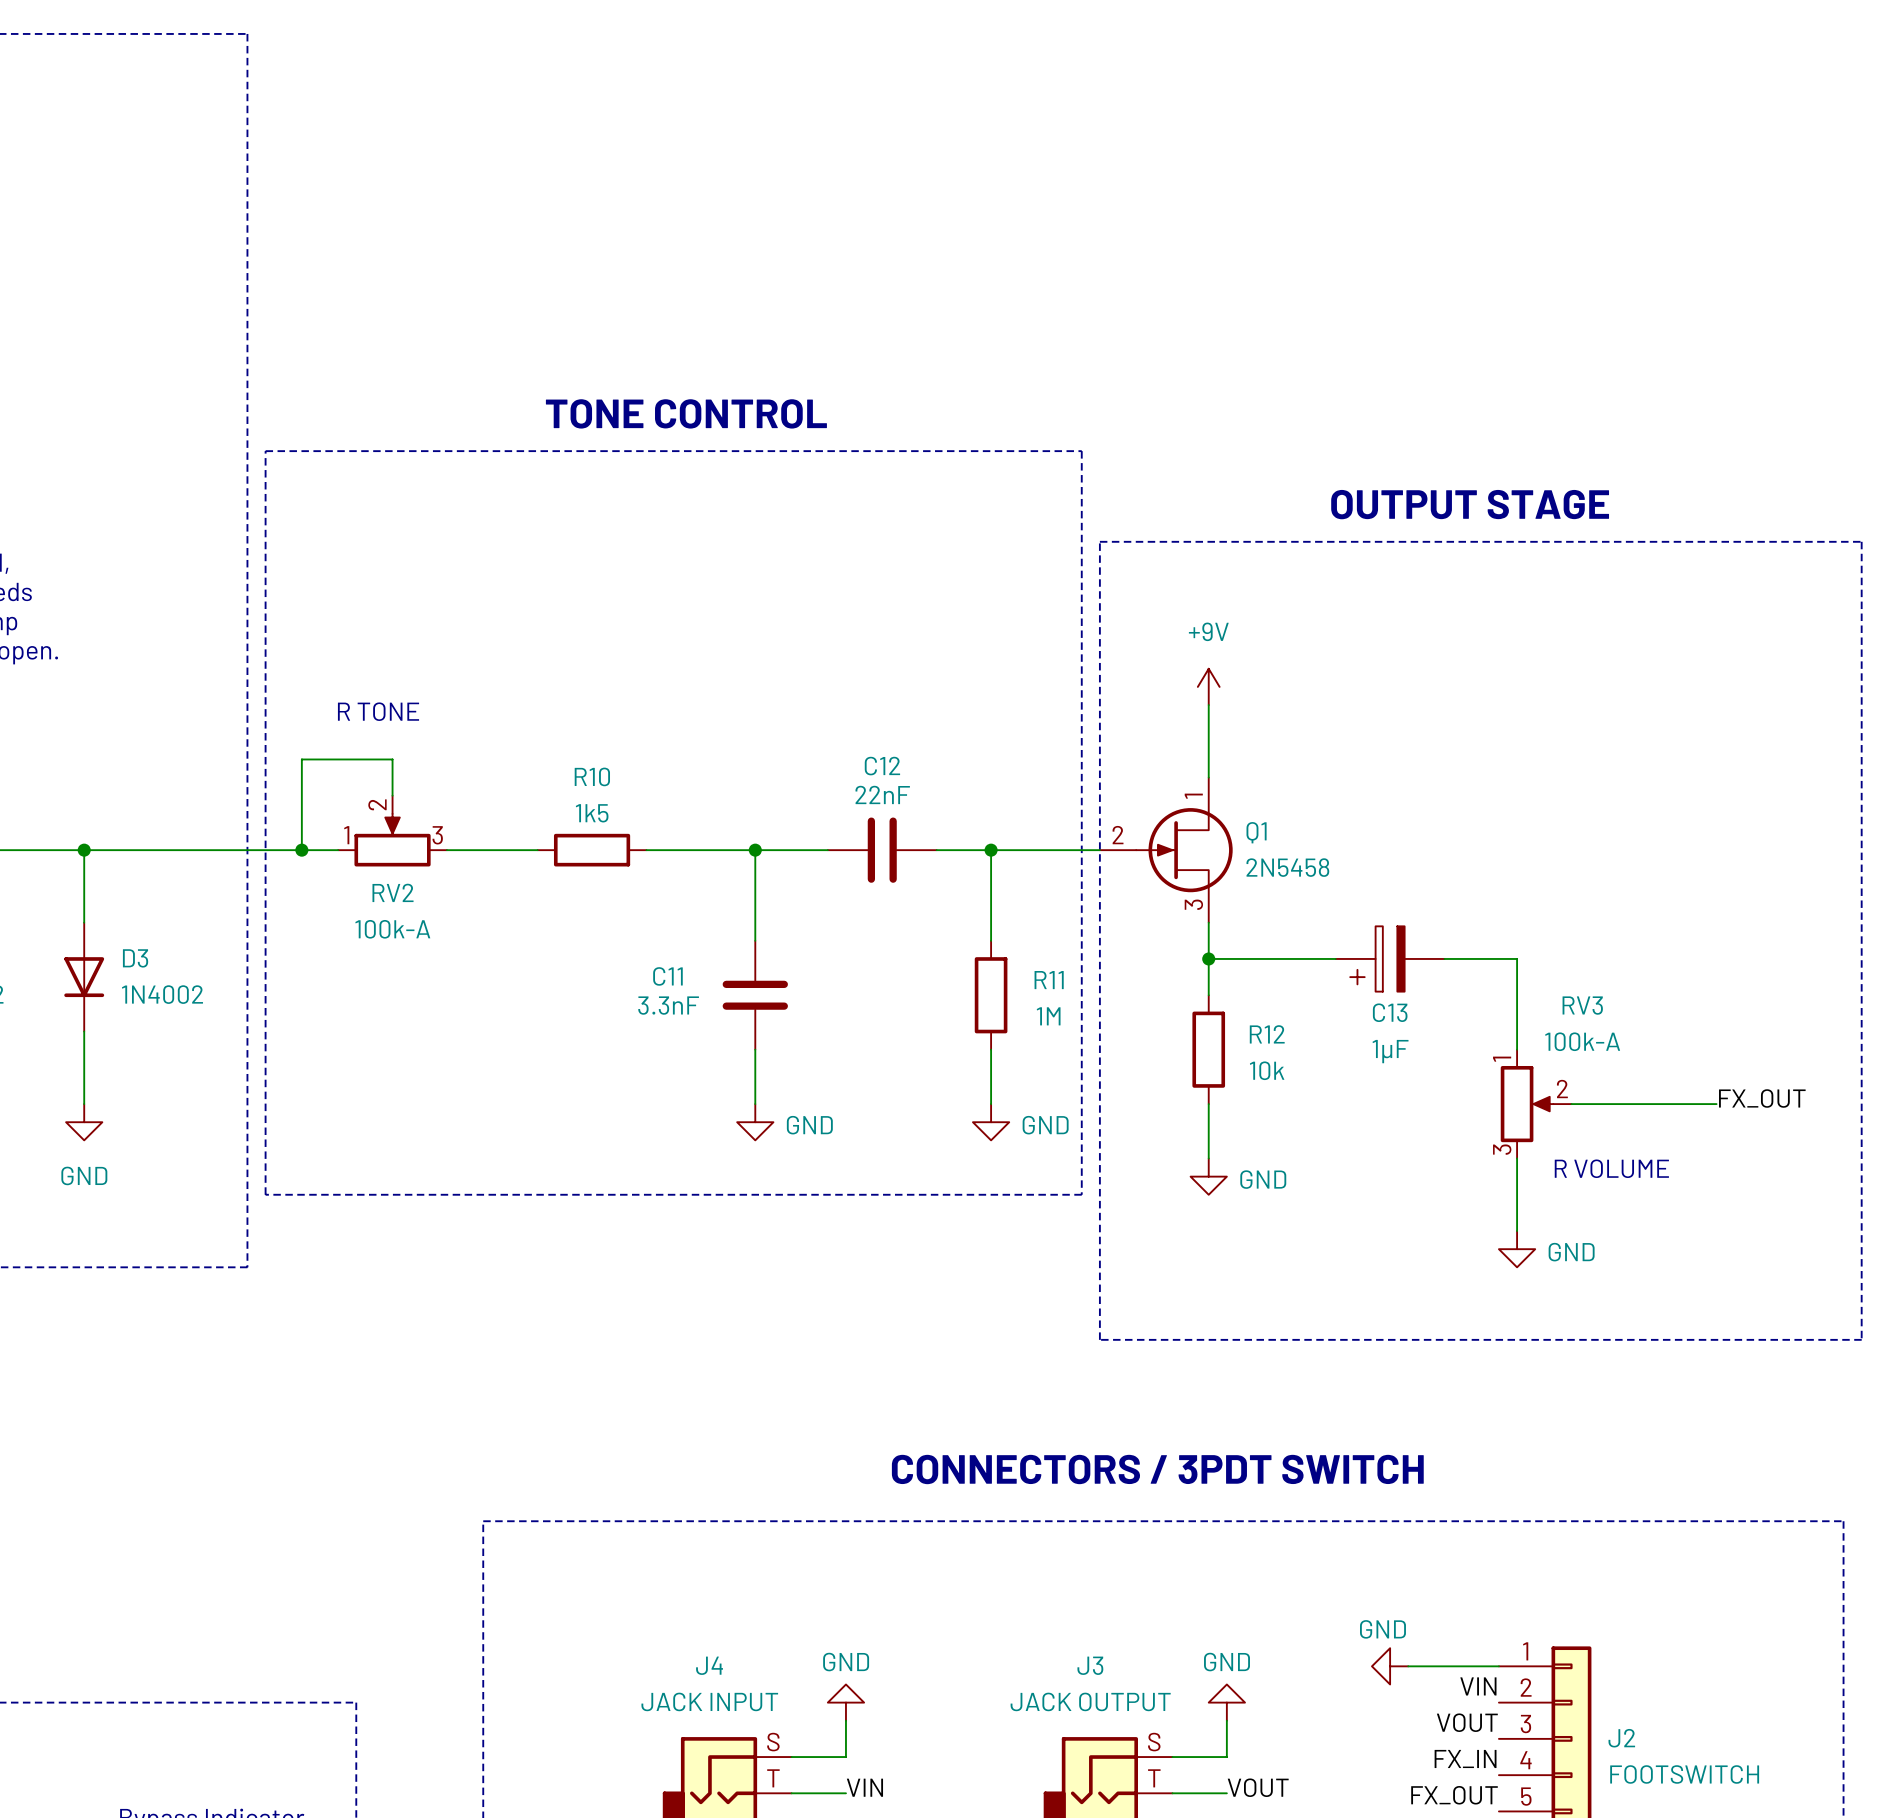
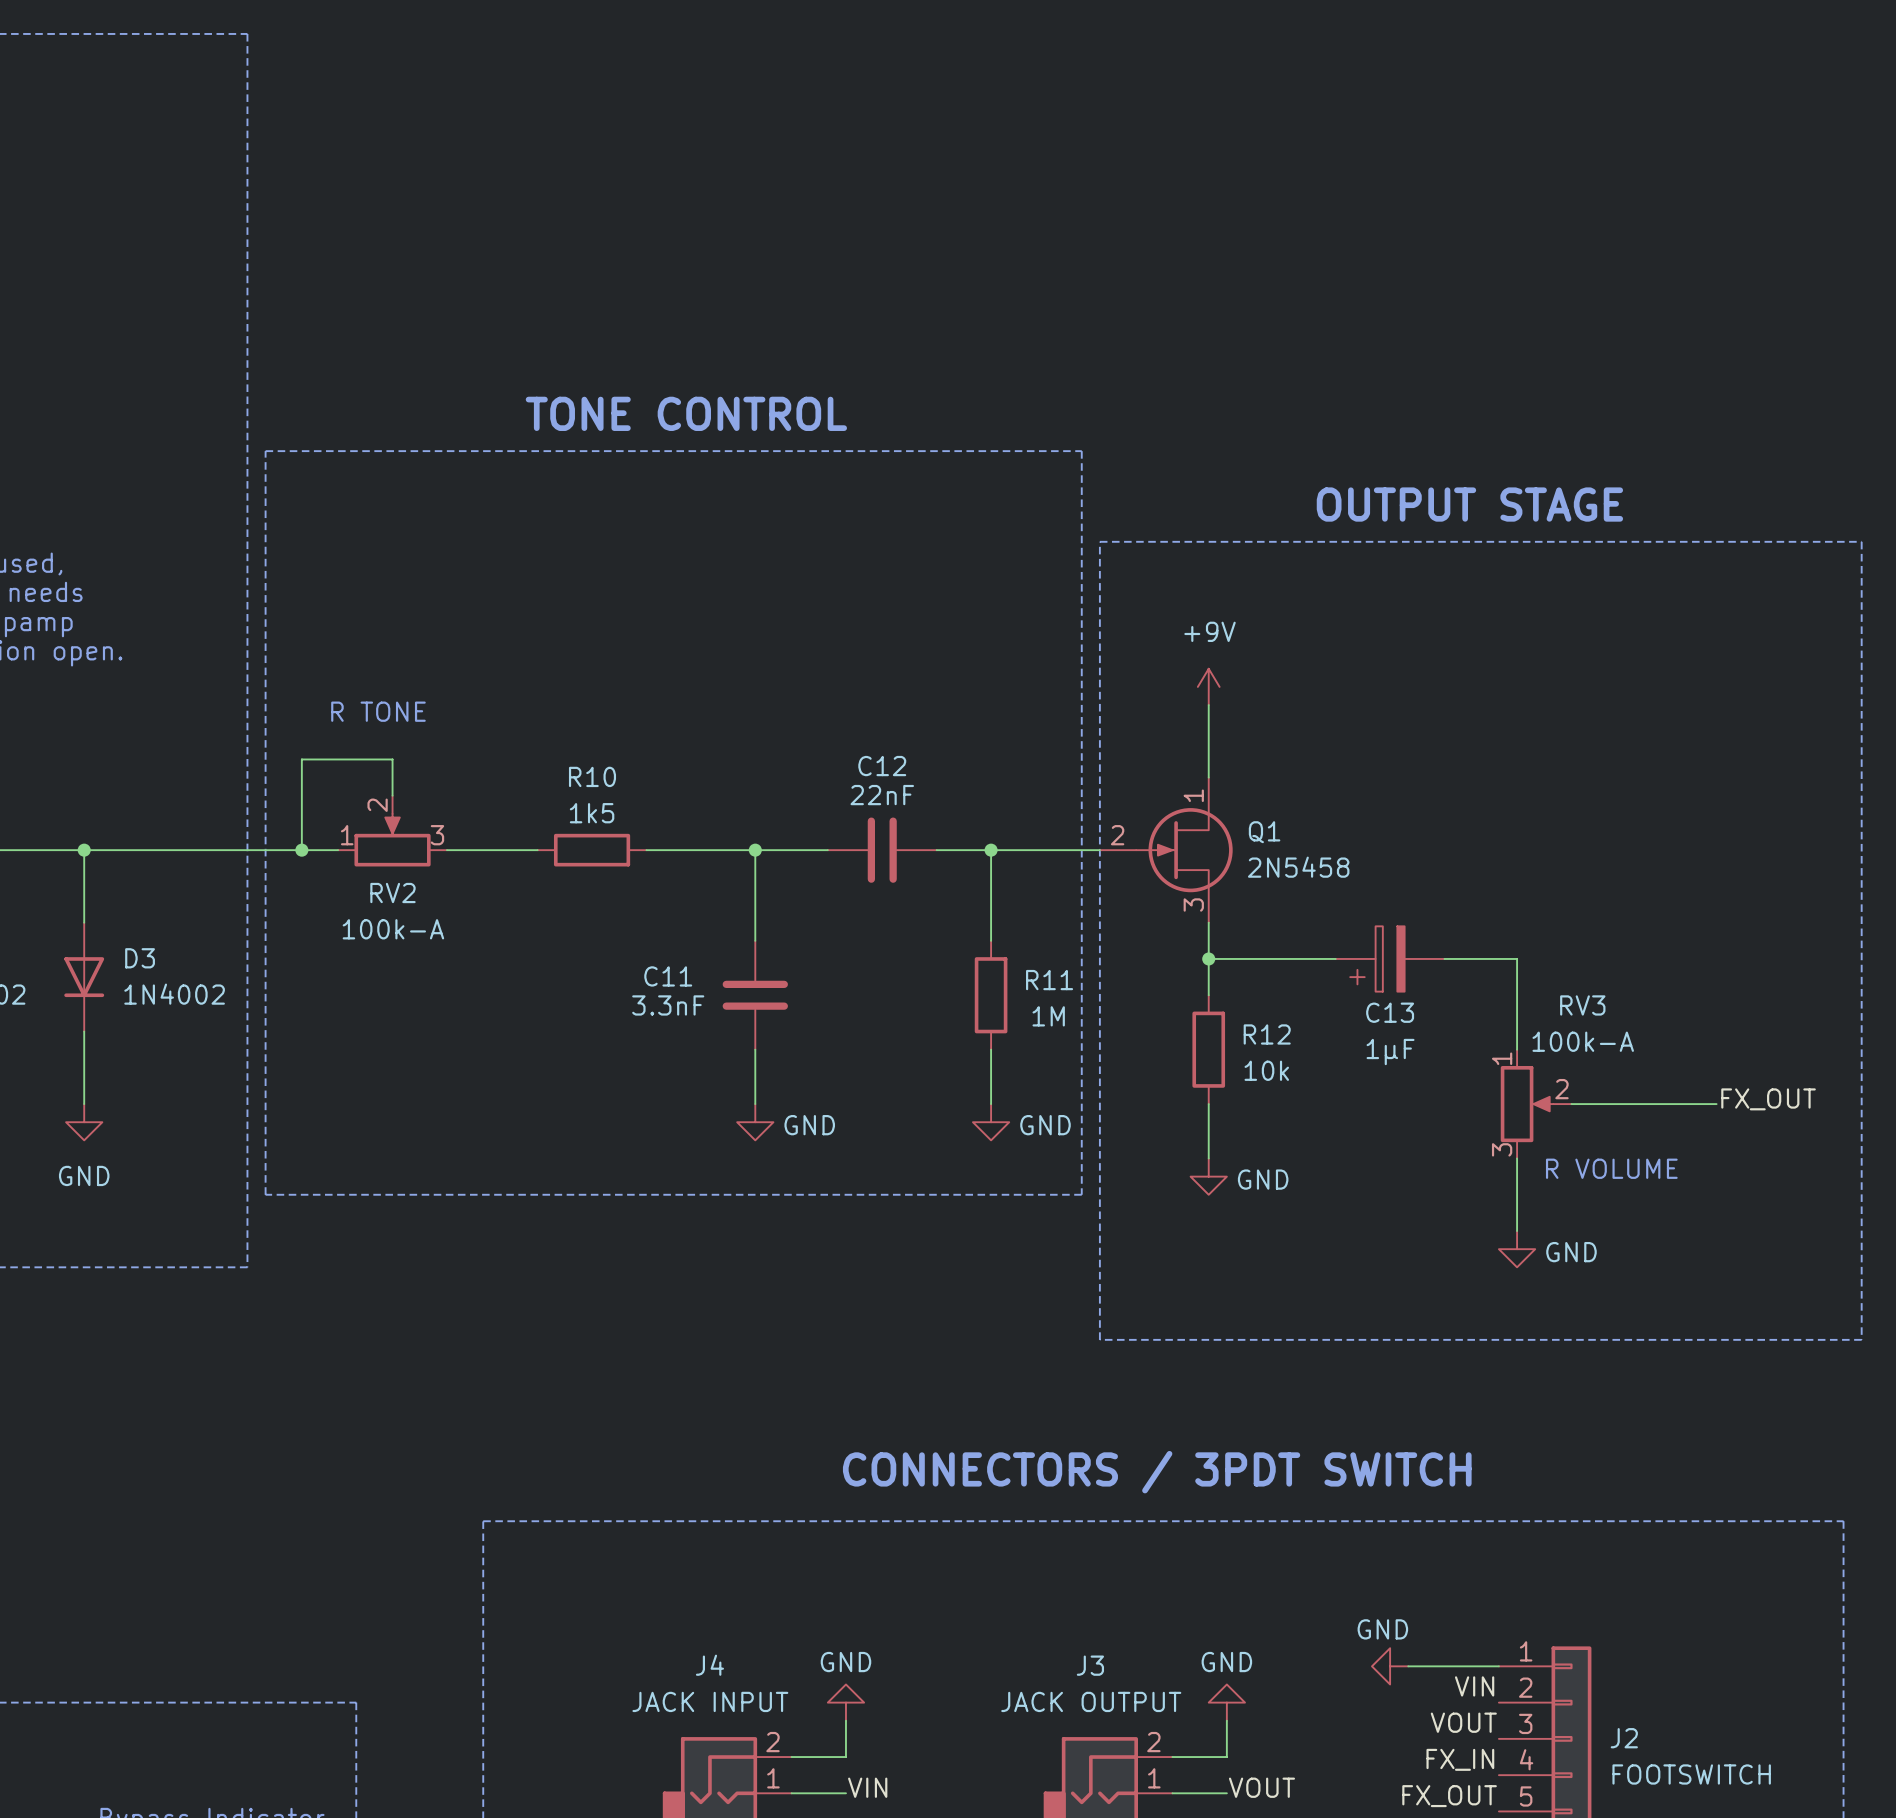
J4 pin number: S (773, 1742) -> 2 (773, 1742)
J3 pin number: S (1154, 1742) -> 2 (1153, 1742)
J4 pin number: T (773, 1778) -> 1 (773, 1778)
J3 pin number: T (1154, 1778) -> 1 (1154, 1778)

